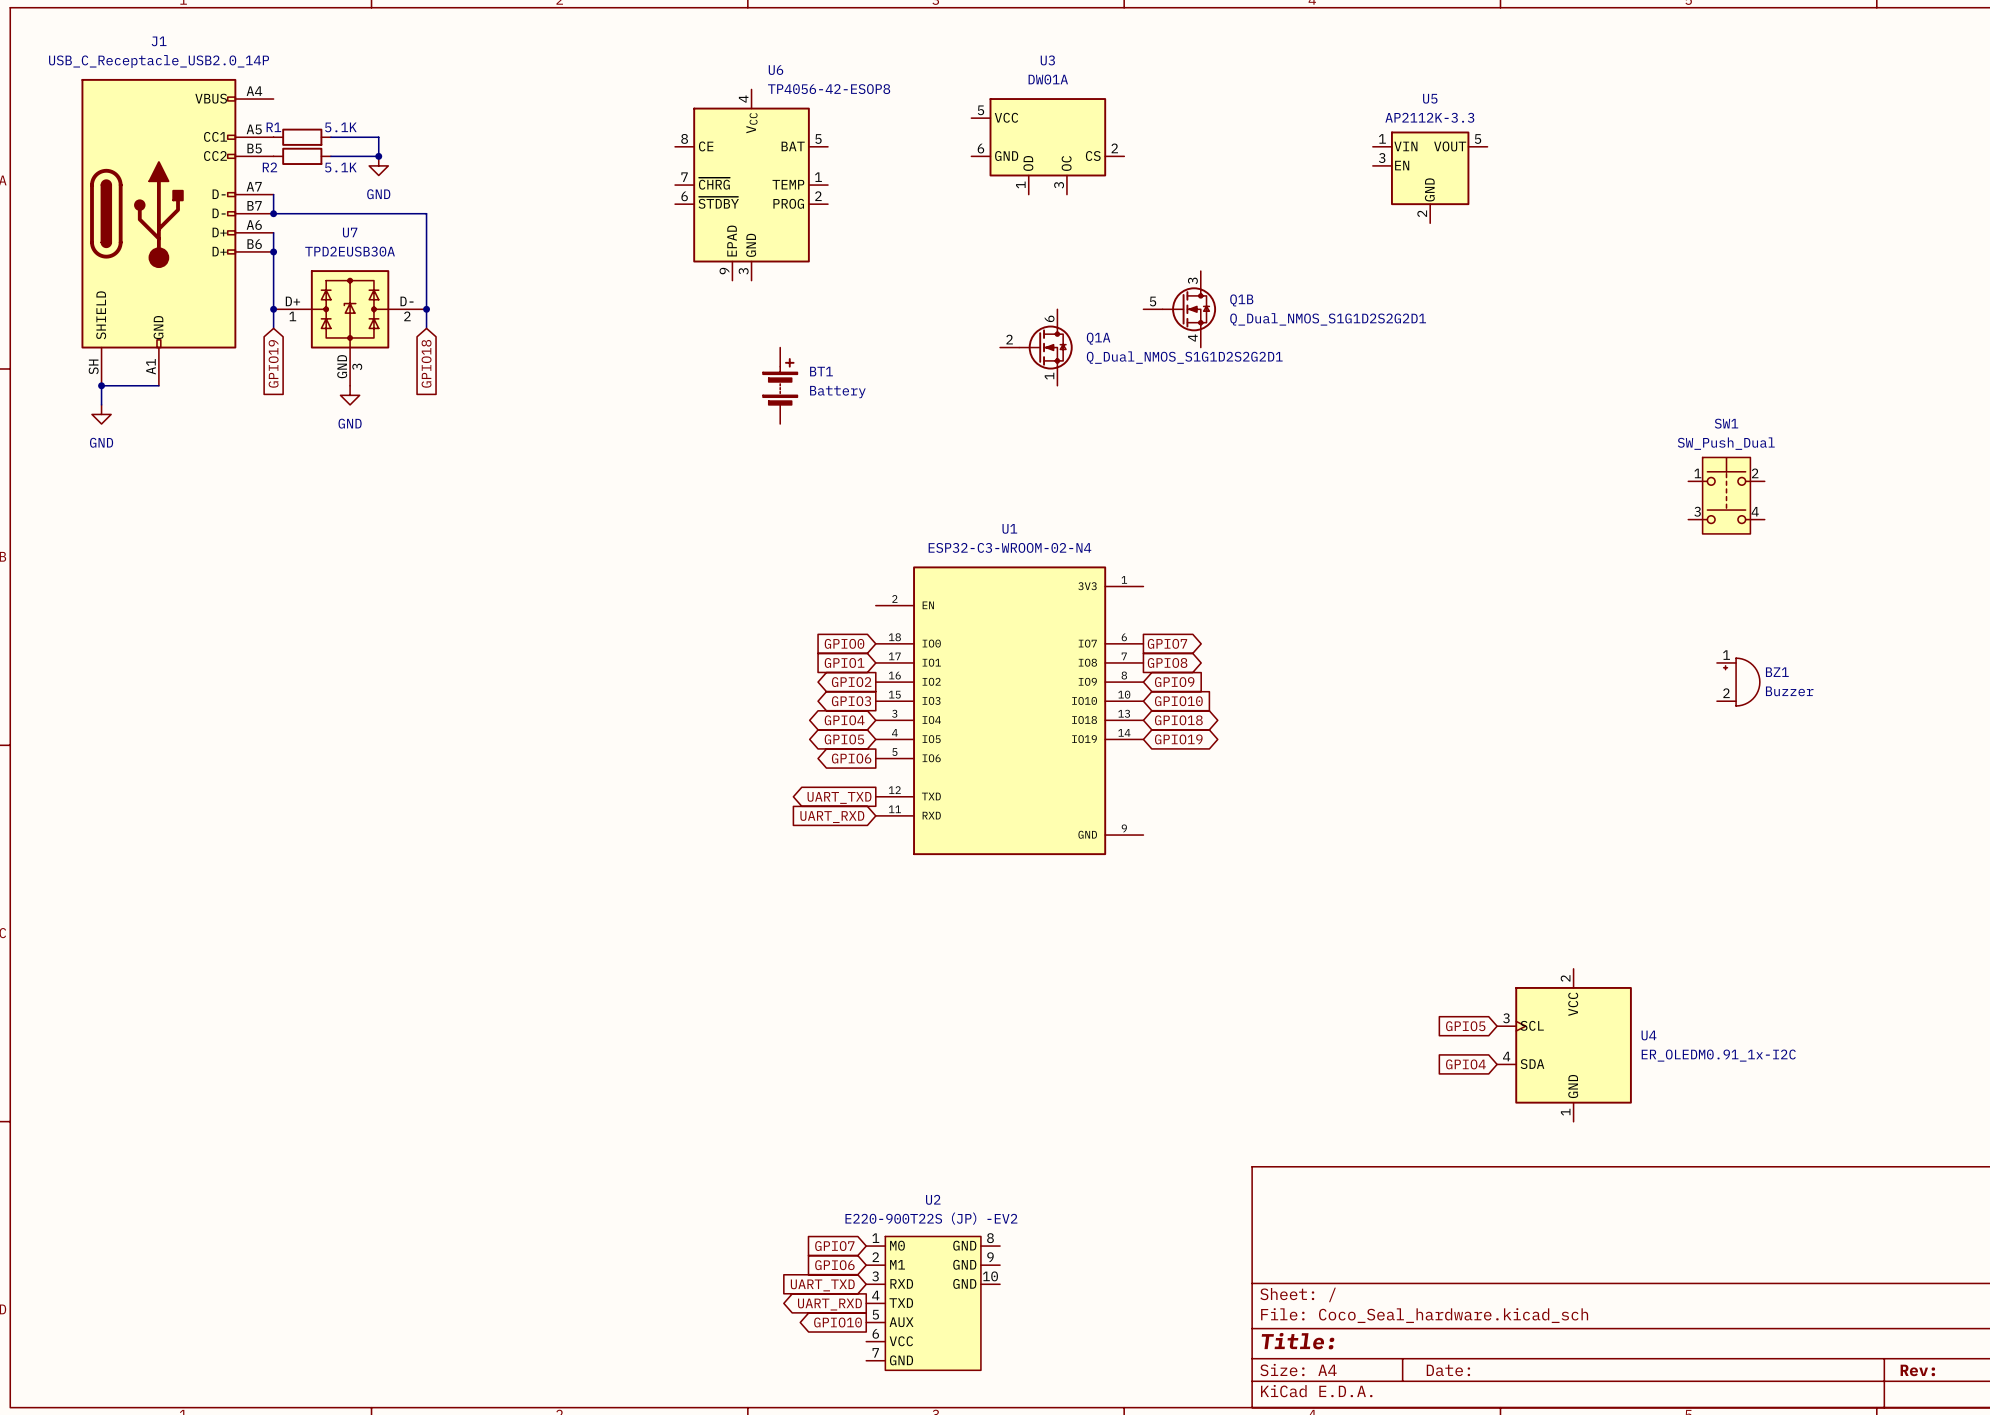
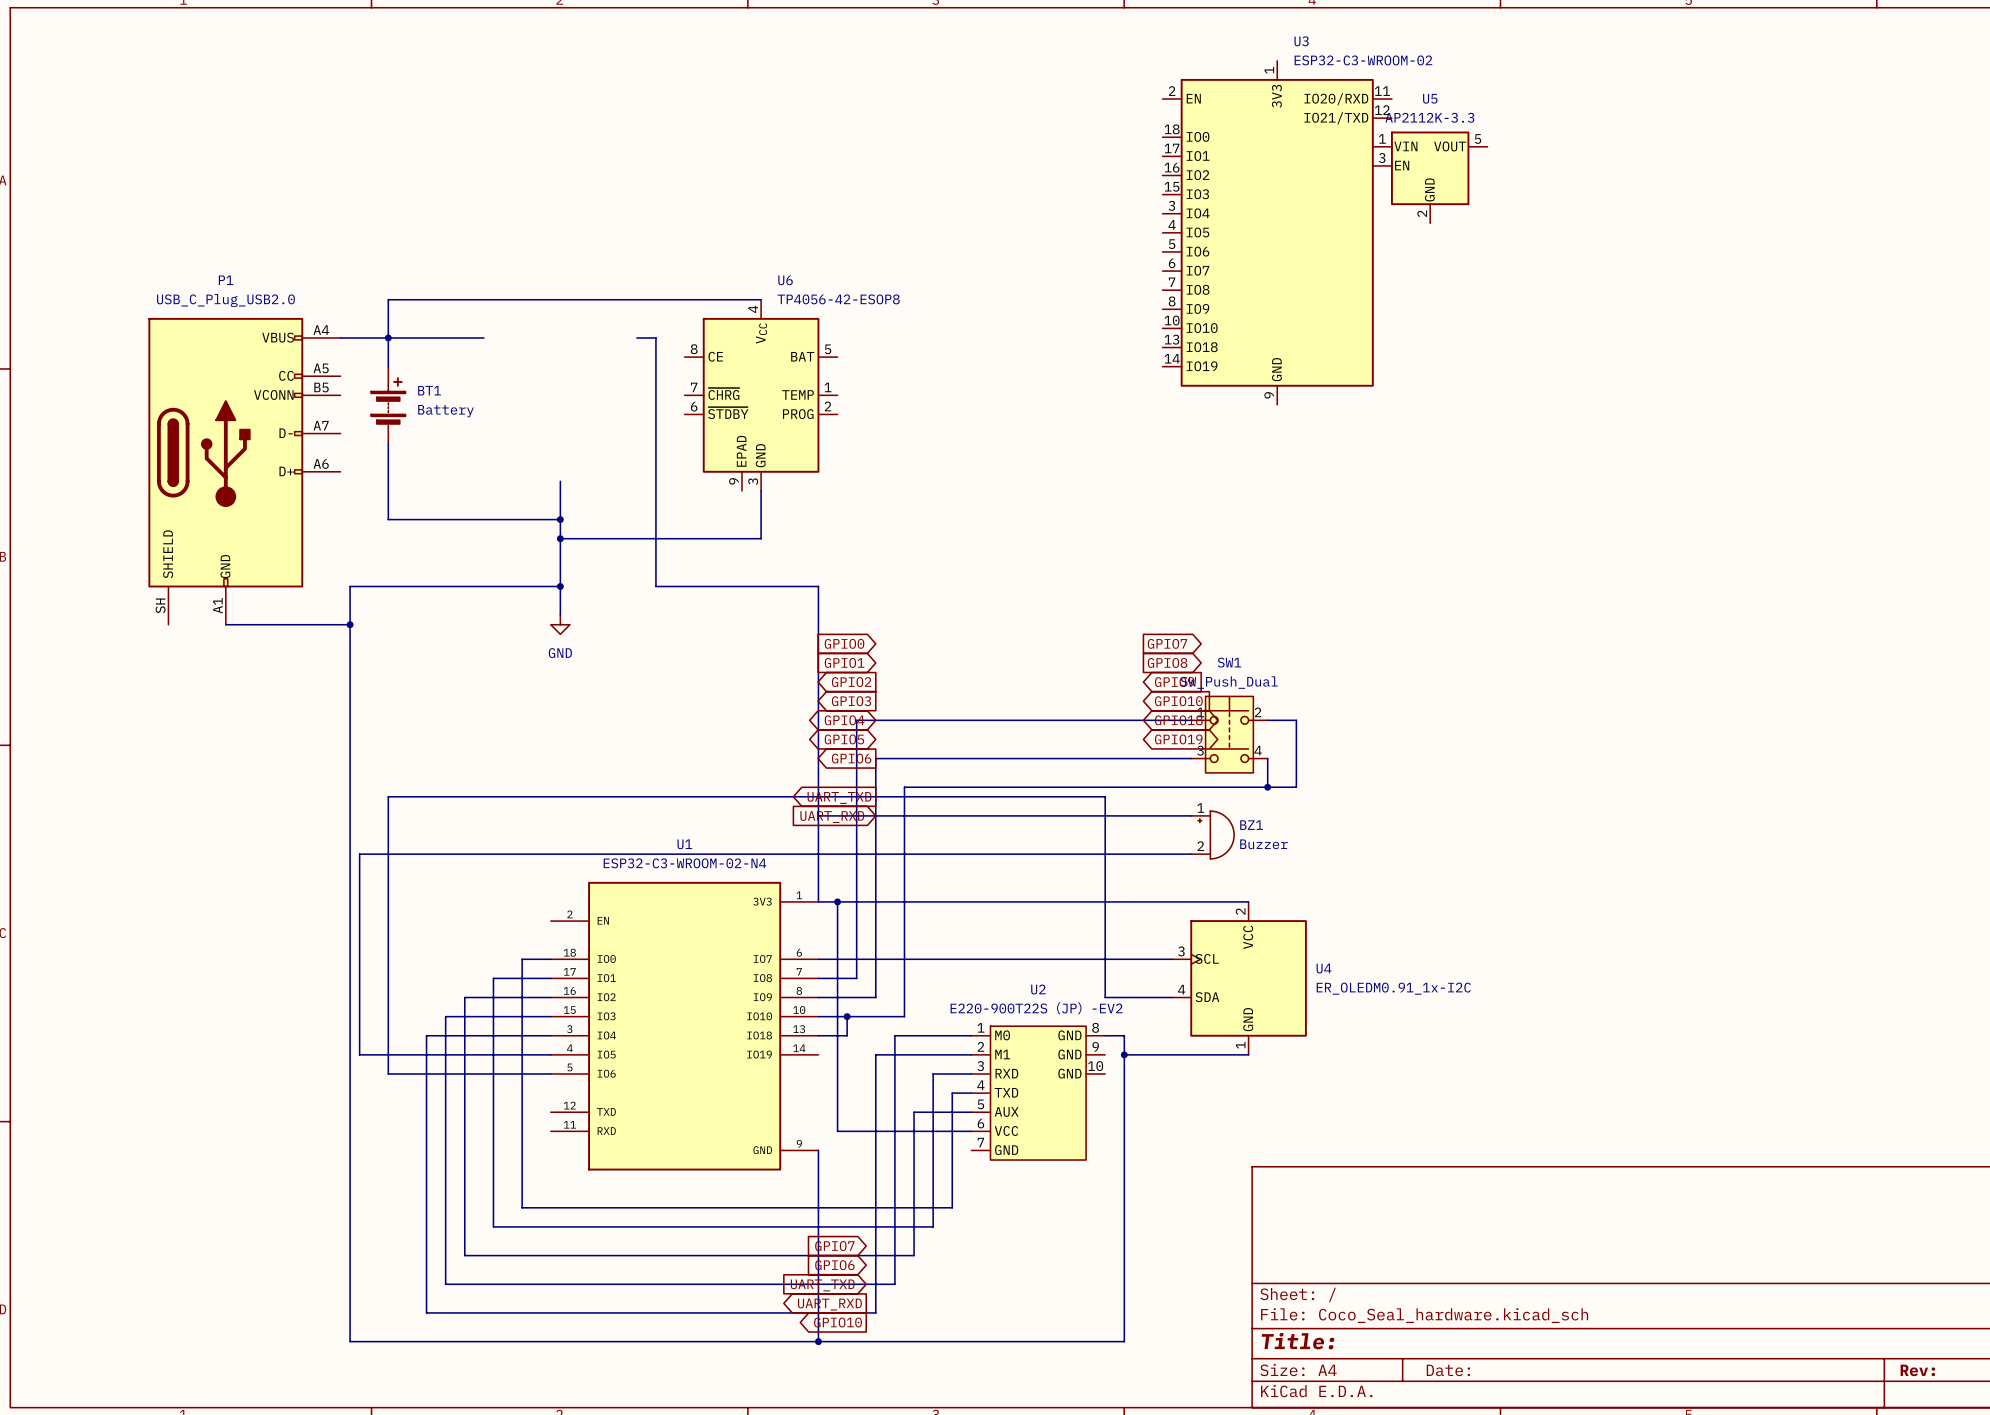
U3 name position: U3 (1047, 60) -> U3 (1301, 41)
U3 value: DW01A (1048, 79) -> ESP32-C3-WROOM-02 (1363, 60)
U3 symbol: [971, 98, 1125, 195] -> [1162, 60, 1392, 405]
R1: 5.1K (302, 137) -> none
wire: (330, 137) (378, 137) (378, 156) (330, 156) -> none
R2: 5.1K (302, 156) -> none
junction: (378, 156) -> none
power symbol: GND (378, 165) -> none
U6 position: (751, 185) -> (761, 395)
wire: (273, 194) (273, 213) (426, 213) (426, 328) -> none
junction: (273, 213) -> none
J1: USB_C_Receptacle_USB2.0_14P (177, 232) -> none
wire: (273, 232) (273, 328) -> none
junction: (273, 251) -> none
bus: none -> (761, 299) (388, 299) (388, 366)
junction: (273, 309) -> none
junction: (426, 309) -> none
Q1B: Q_Dual_NMOS_S1G1D2S2G2D1 (1179, 309) -> none
U7: TPD2EUSB30A (350, 327) -> none
bus: none -> (340, 337) (483, 337)
junction: none -> (388, 337)
bus: none -> (636, 337) (655, 337) (655, 586) (818, 586) (818, 901) (1248, 901)
Q1A: Q_Dual_NMOS_S1G1D2S2G2D1 (1036, 347) -> none
global label: GPIO19 (273, 363) -> none
global label: GPIO18 (426, 363) -> none
junction: (101, 385) -> none
wire: (158, 385) (101, 385) (101, 404) -> none
BT1 position: (780, 385) -> (388, 404)
power symbol: GND (350, 395) -> none
power symbol: GND (101, 414) -> none
bus: none -> (388, 443) (388, 519) (560, 519)
P1: none -> USB_C_Plug_USB2.0 (244, 471)
bus: none -> (560, 481) (560, 615)
bus: none -> (761, 490) (761, 538) (560, 538)
SW1 position: (1726, 495) -> (1229, 734)
junction: none -> (560, 519)
junction: none -> (560, 538)
bus: none -> (560, 586) (350, 586) (350, 1341) (1124, 1341) (1124, 1035) (1105, 1035)
junction: none -> (560, 586)
bus: none -> (225, 624) (350, 624)
junction: none -> (350, 624)
power symbol: none -> GND (560, 624)
BZ1 position: (1738, 682) -> (1212, 835)
U1 position: (1009, 710) -> (684, 1026)
bus: none -> (1191, 720) (856, 720) (856, 978) (818, 978)
bus: none -> (1267, 720) (1296, 720) (1296, 787) (904, 787) (904, 1016) (818, 1016)
bus: none -> (1191, 758) (875, 758) (875, 997) (818, 997)
bus: none -> (1267, 758) (1267, 787)
junction: none -> (1267, 787)
bus: none -> (818, 815) (1191, 815)
bus: none -> (1191, 854) (359, 854) (359, 1054) (550, 1054)
bus: none -> (837, 901) (837, 1131) (971, 1131)
junction: none -> (837, 901)
bus: none -> (550, 959) (522, 959) (522, 1207) (952, 1207) (952, 1093) (971, 1093)
wire: none -> (818, 959) (1172, 959)
bus: none -> (550, 978) (493, 978) (493, 1226) (933, 1226) (933, 1073) (971, 1073)
bus: none -> (550, 997) (464, 997) (464, 1255) (914, 1255) (914, 1112) (971, 1112)
wire: none -> (1172, 997) (1105, 997) (1105, 796) (388, 796) (388, 1073) (550, 1073)
bus: none -> (550, 1016) (445, 1016) (445, 1284) (894, 1284) (894, 1035) (971, 1035)
bus: none -> (847, 1016) (847, 1035) (818, 1035)
junction: none -> (847, 1016)
global label: GPIO5 (1465, 1026) -> none
bus: none -> (550, 1035) (426, 1035) (426, 1312) (875, 1312) (875, 1054) (971, 1054)
U4 position: (1564, 1045) -> (1239, 978)
bus: none -> (1124, 1054) (1248, 1054)
junction: none -> (1124, 1054)
global label: GPIO4 (1465, 1064) -> none
bus: none -> (818, 1150) (818, 1341)
U2 position: (933, 1303) -> (1038, 1093)
junction: none -> (818, 1341)

